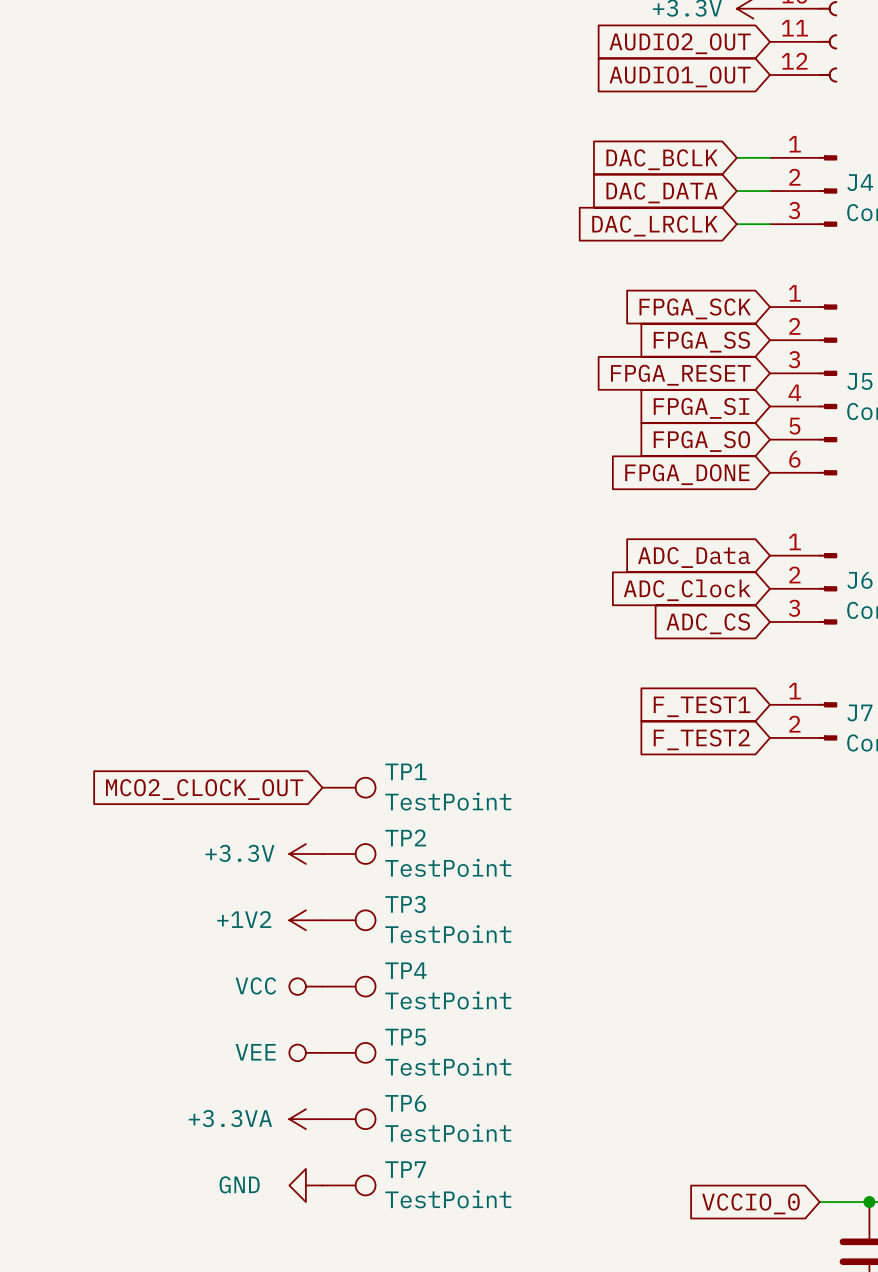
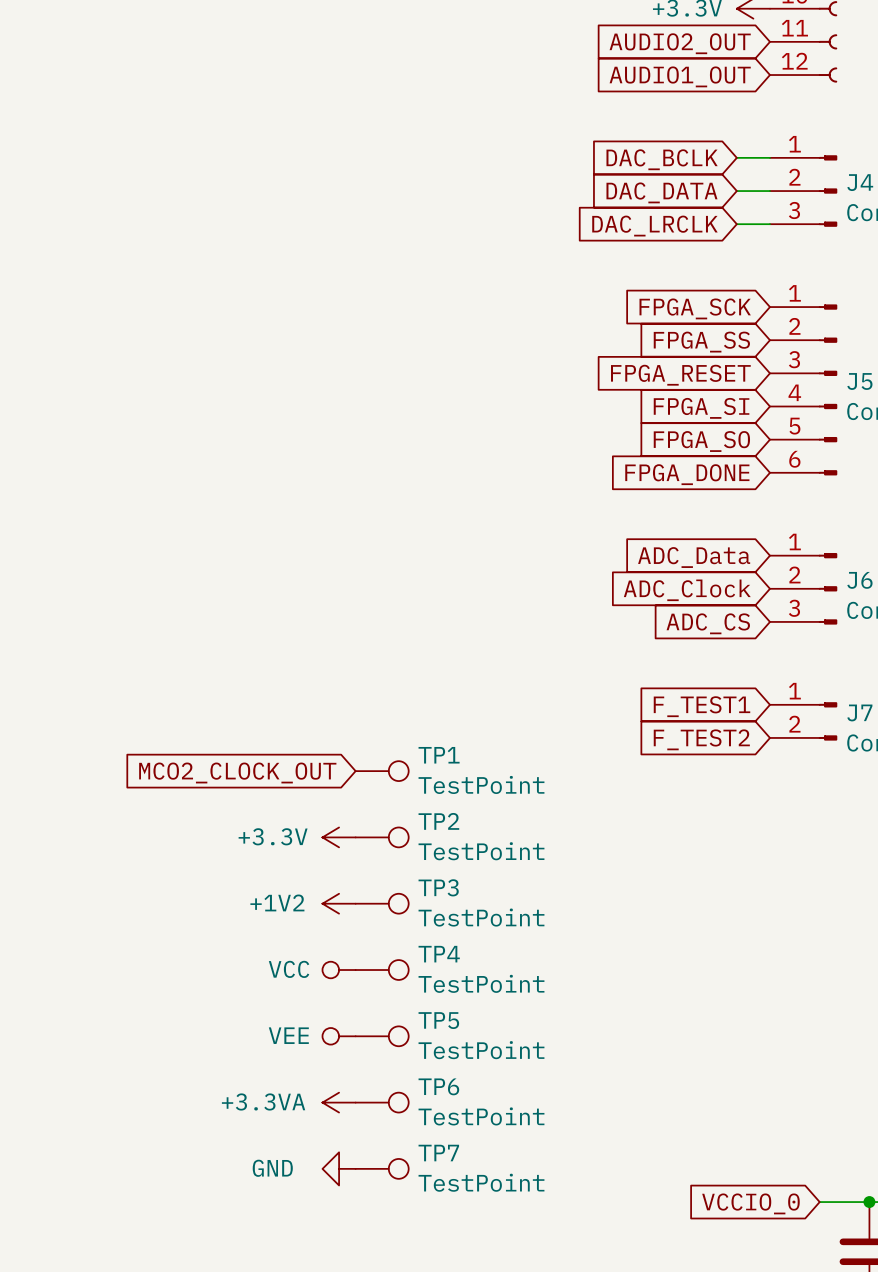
TP1 position: (349, 787) -> (382, 771)
global label position: MCO2_CLOCK_OUT (204, 789) -> MCO2_CLOCK_OUT (237, 772)
power symbol position: +3.3V (305, 853) -> +3.3V (339, 837)
TP2 position: (349, 853) -> (382, 837)
power symbol position: +1V2 (305, 920) -> +1V2 (339, 903)
TP3 position: (349, 920) -> (382, 903)
power symbol position: VCC (305, 986) -> VCC (339, 970)
TP4 position: (349, 986) -> (382, 970)
power symbol position: VEE (305, 1052) -> VEE (339, 1036)
TP5 position: (349, 1052) -> (382, 1036)
power symbol position: +3.3VA (305, 1119) -> +3.3VA (339, 1102)
TP6 position: (349, 1119) -> (382, 1102)
power symbol position: GND (305, 1185) -> GND (339, 1168)
TP7 position: (349, 1185) -> (382, 1168)

